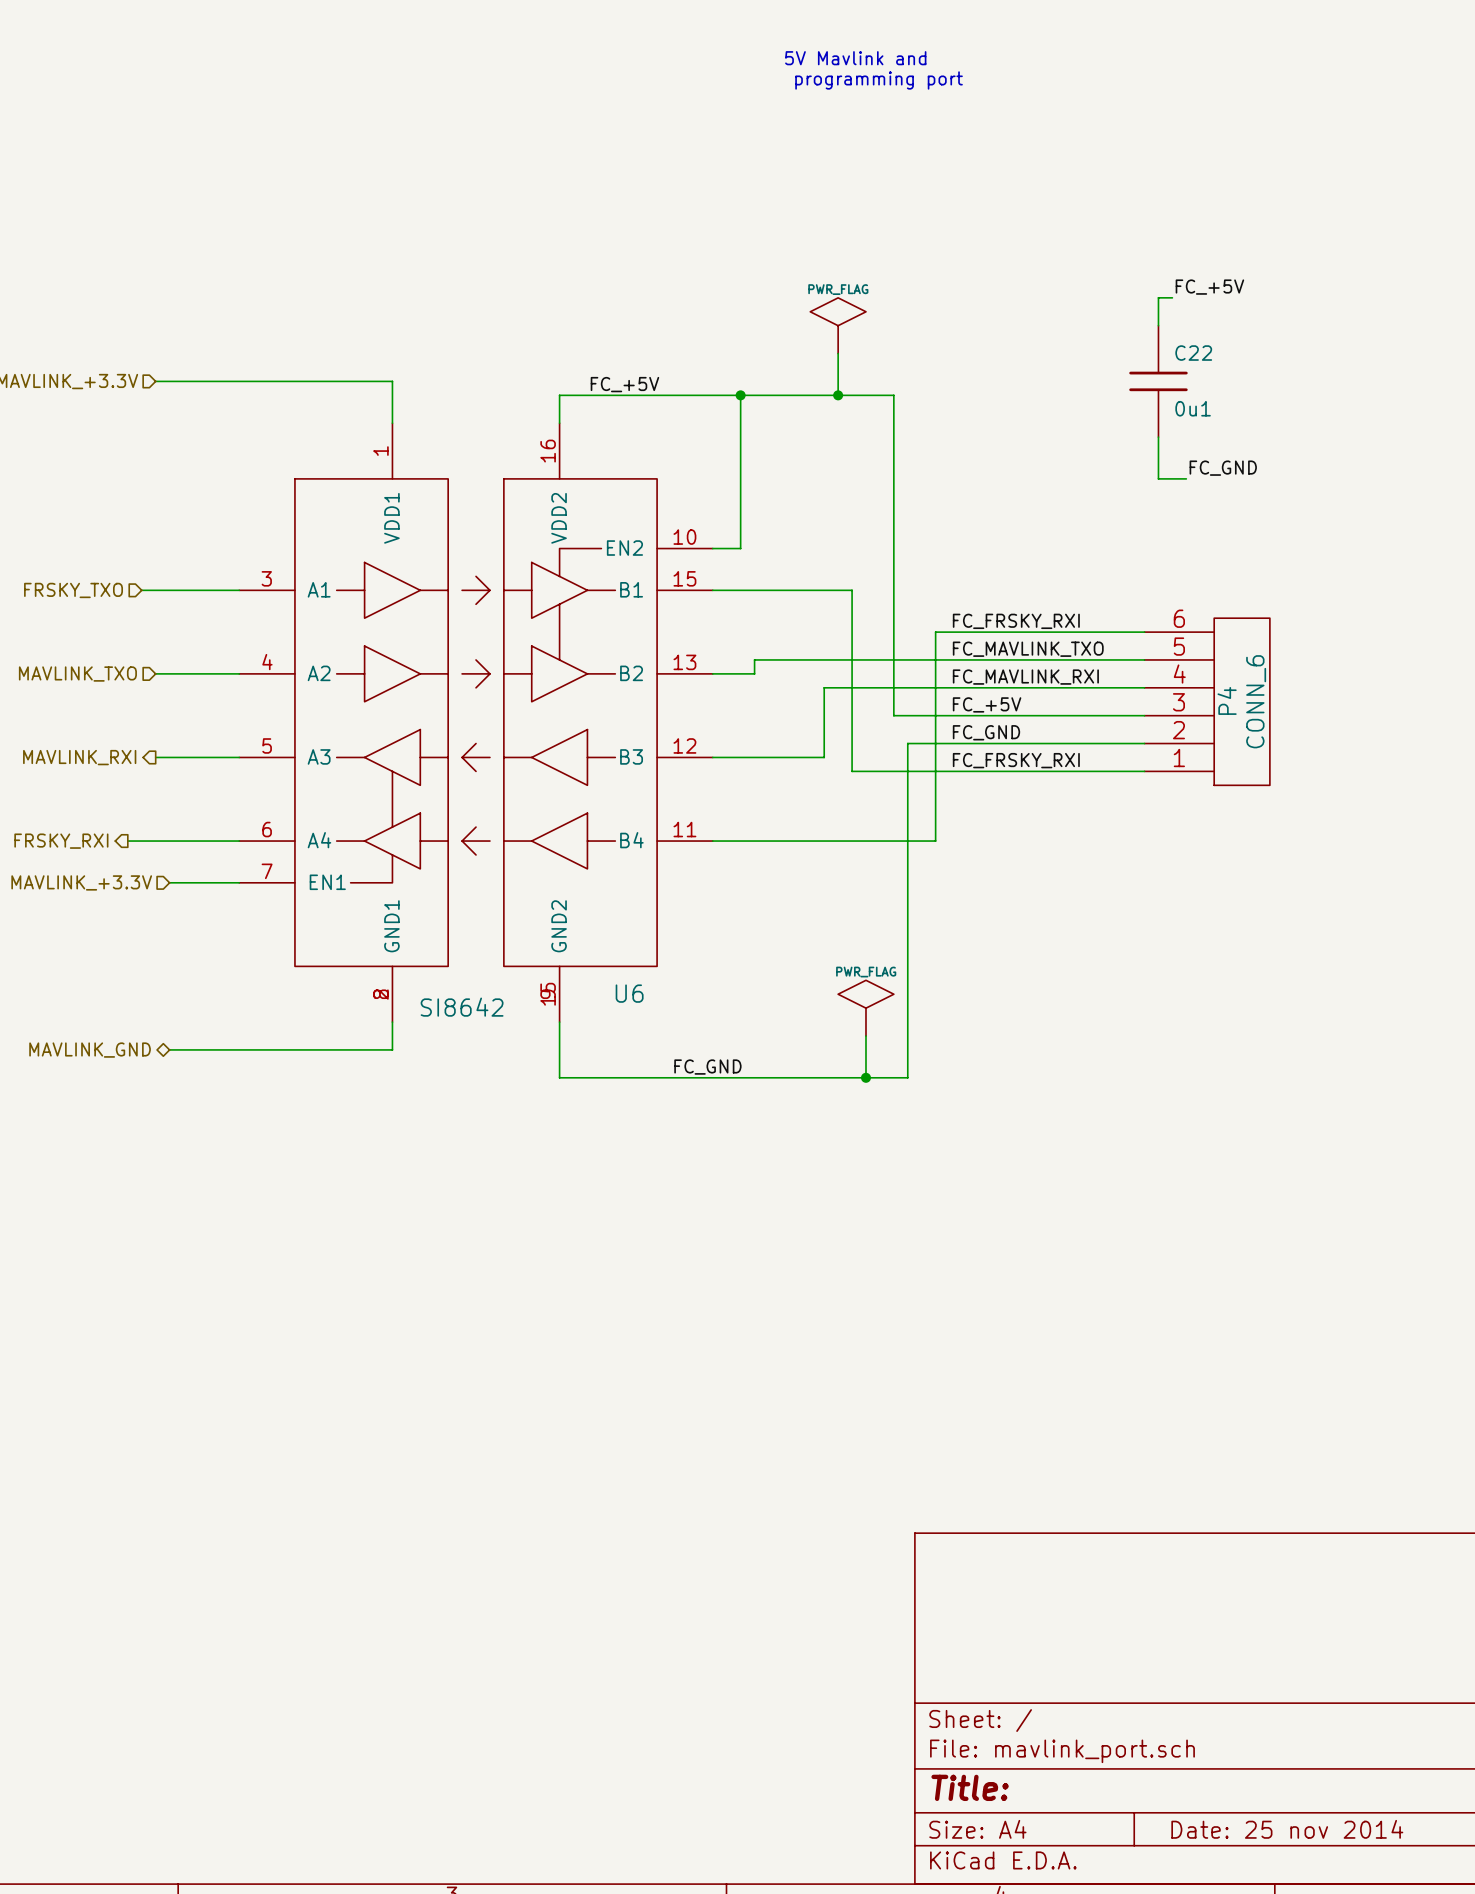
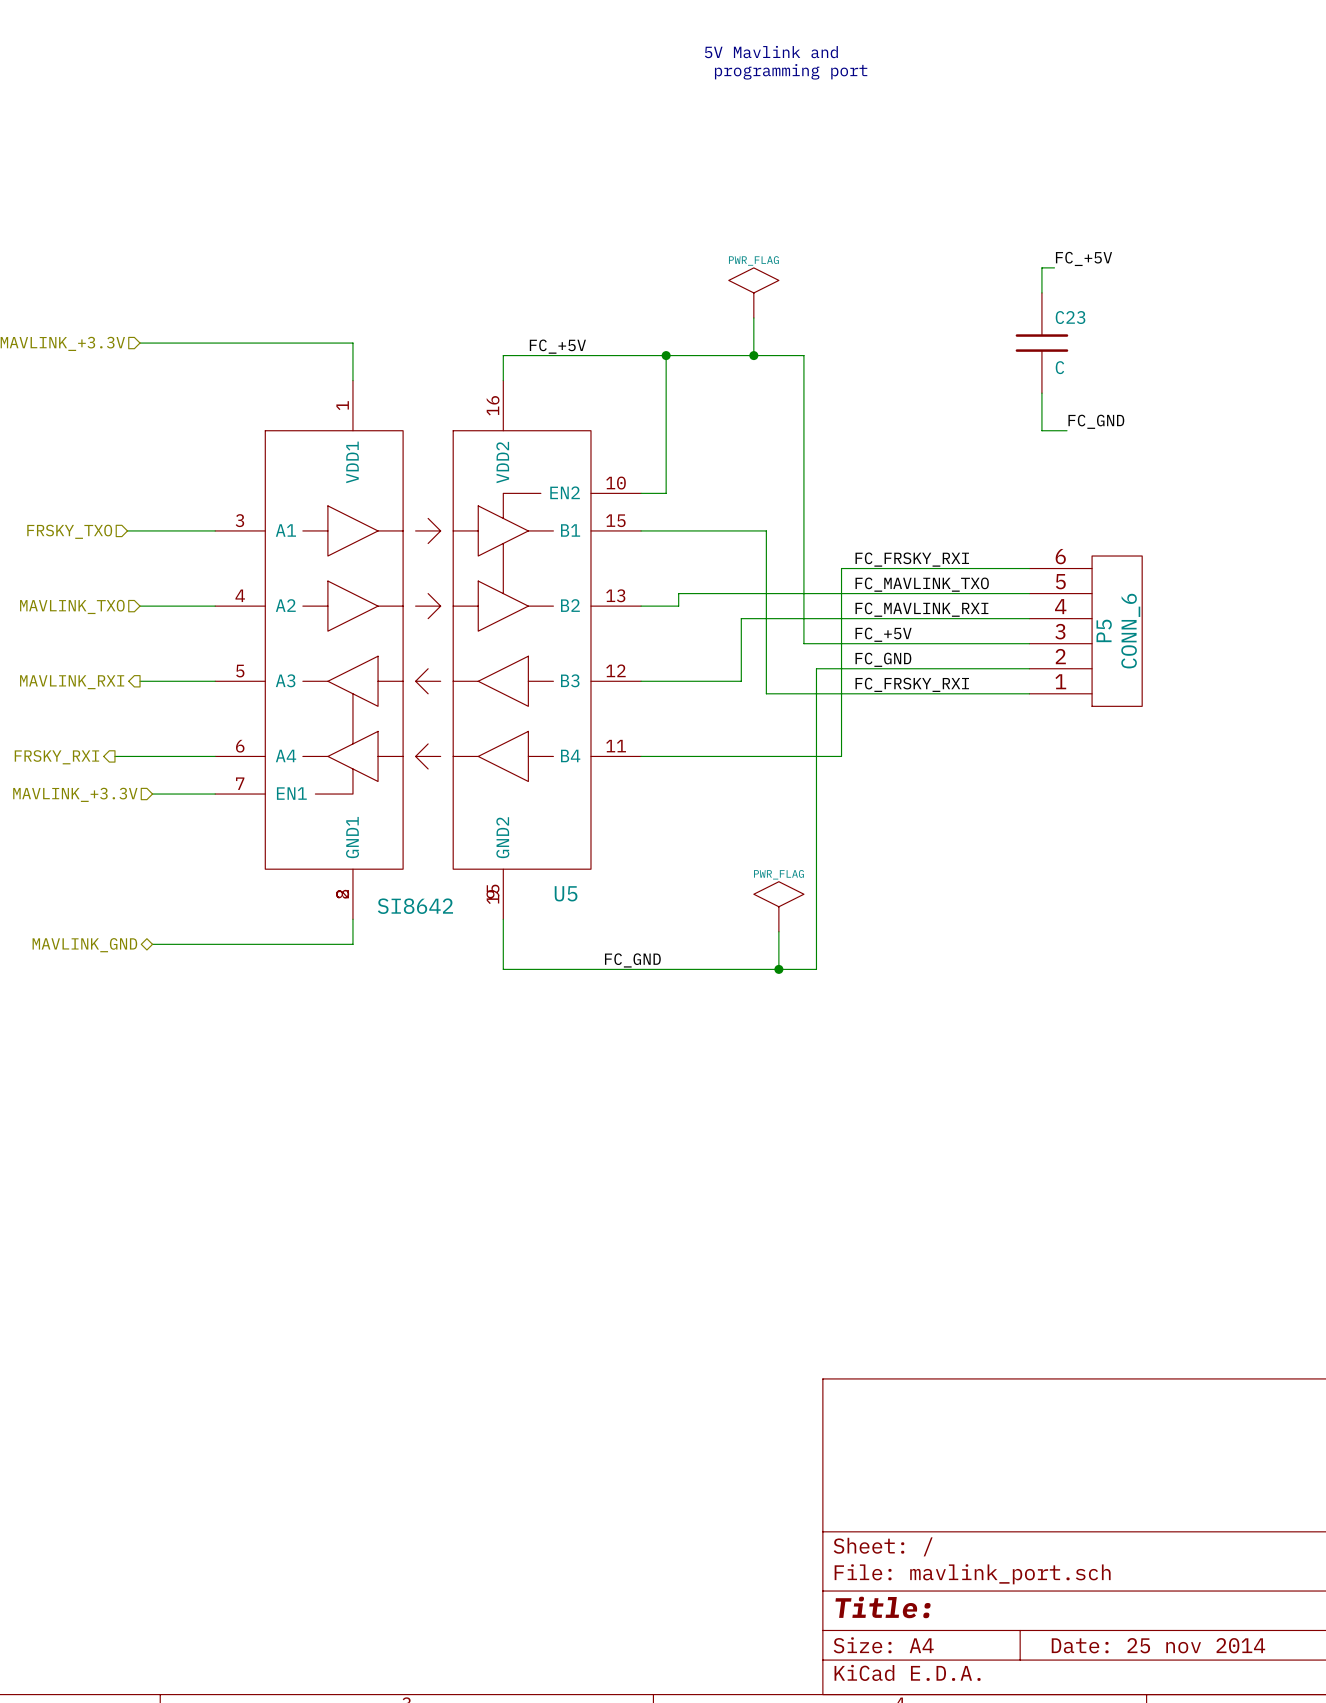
C22 name: C22 (1193, 353) -> C23 (1070, 317)
C22 value: 0u1 (1193, 408) -> C (1059, 367)
P4 name: P4 (1227, 700) -> P5 (1104, 630)
U6 name: U6 (629, 993) -> U5 (566, 893)

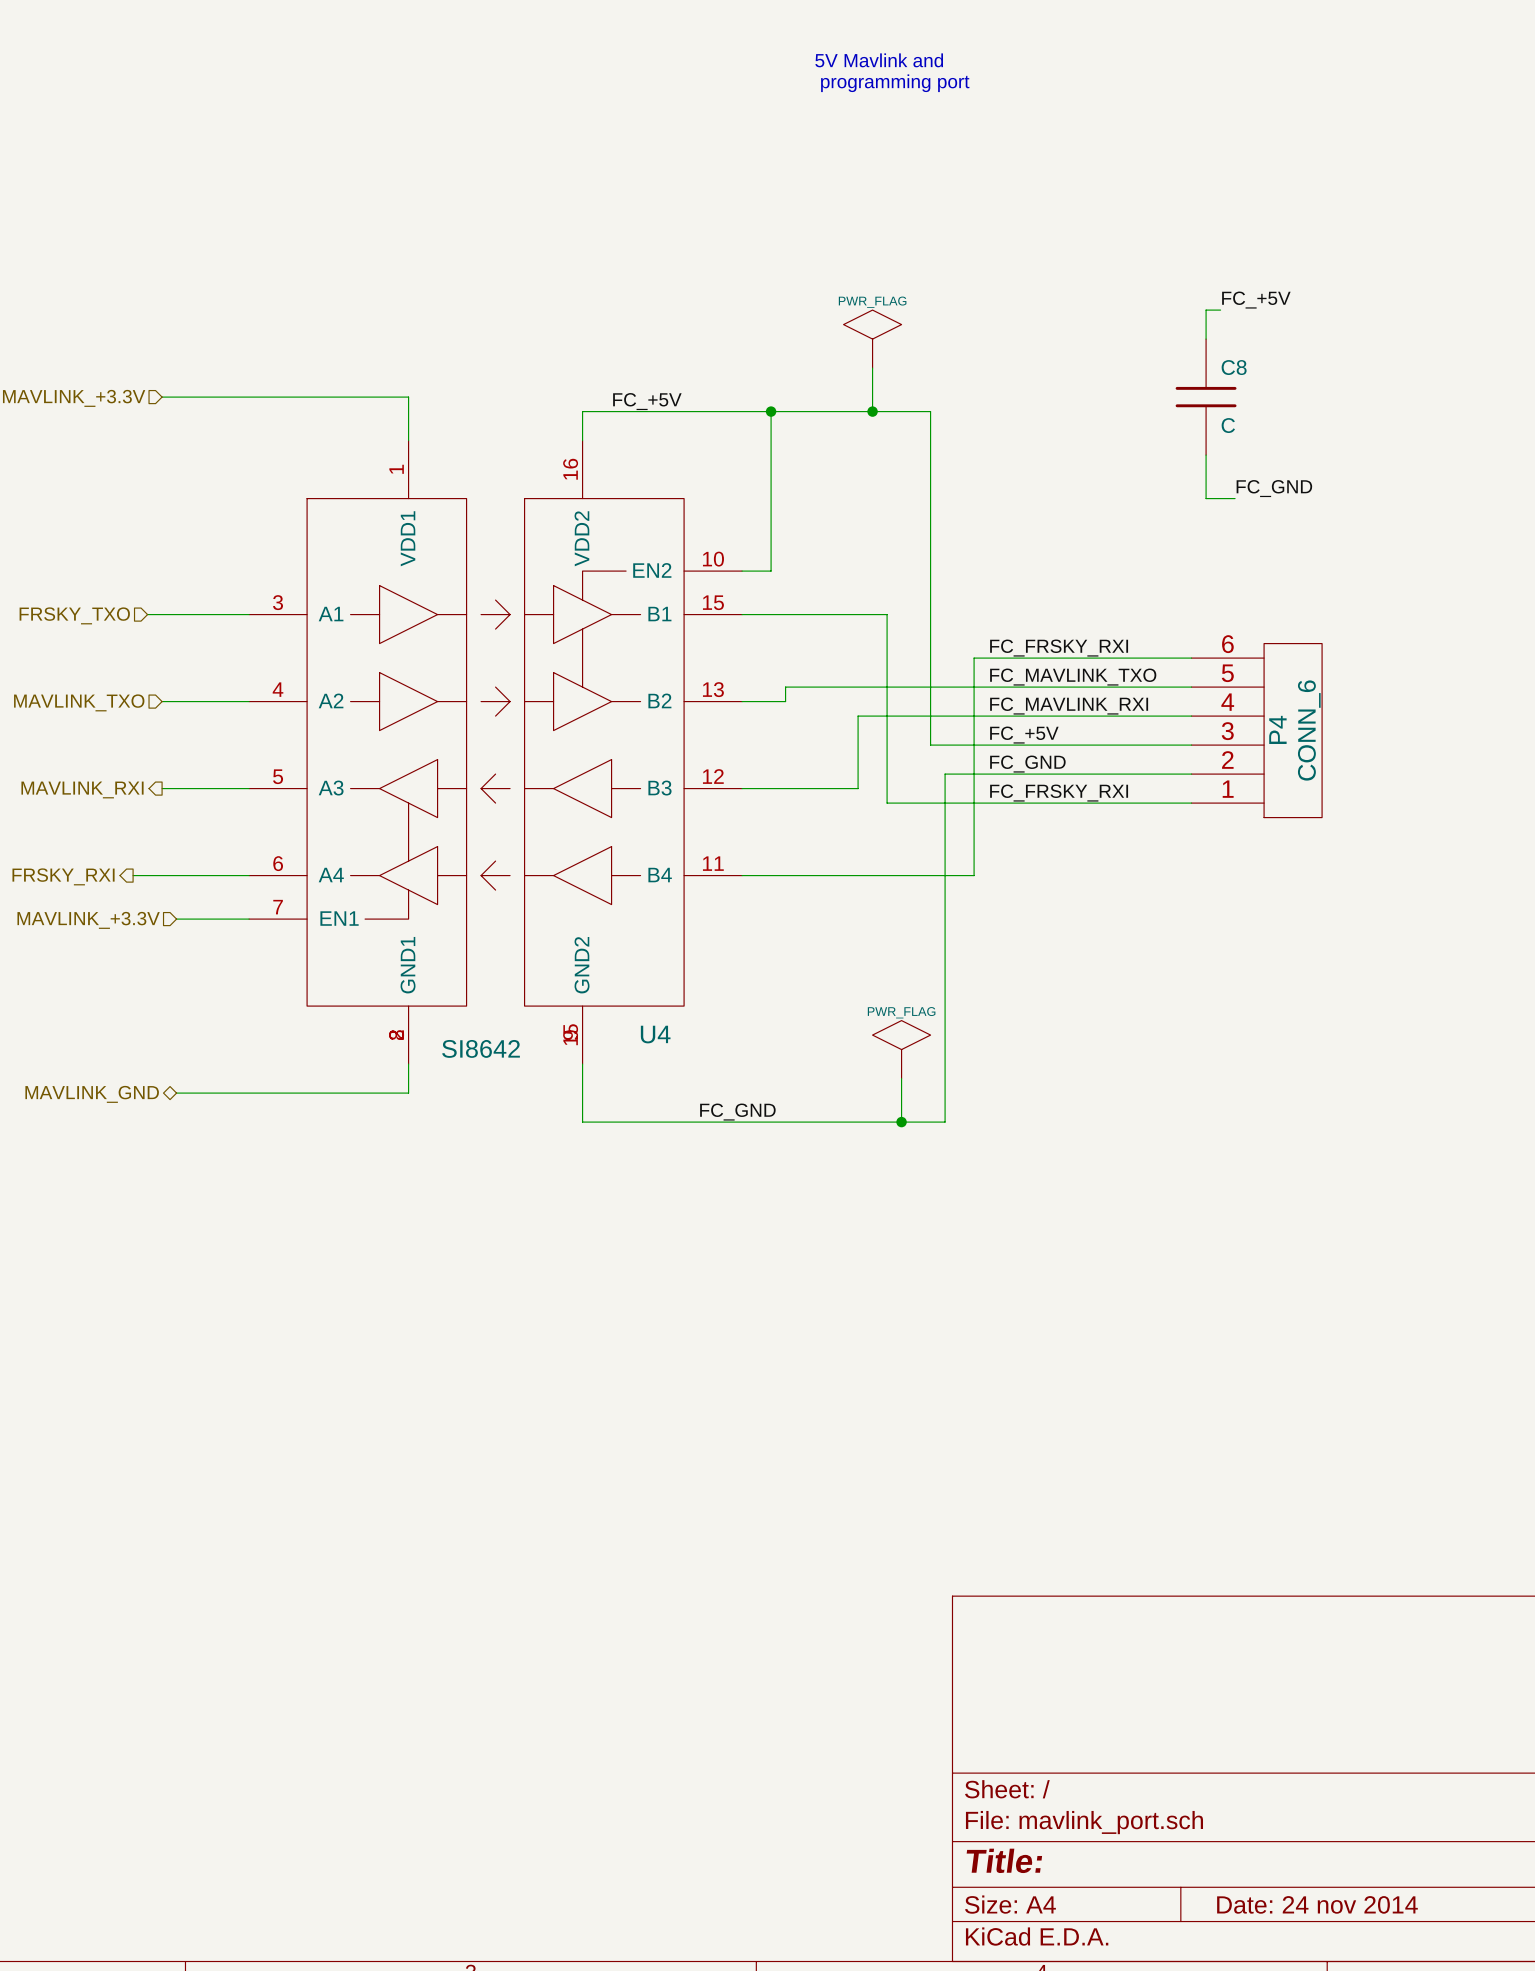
C23 name: C23 (1070, 317) -> C8 (1234, 367)
P5 name: P5 (1104, 630) -> P4 (1277, 729)
U5 name: U5 (566, 893) -> U4 (655, 1034)
title block: Date: 25 nov 2014 (1158, 1645) -> Date: 24 nov 2014 (1317, 1904)

